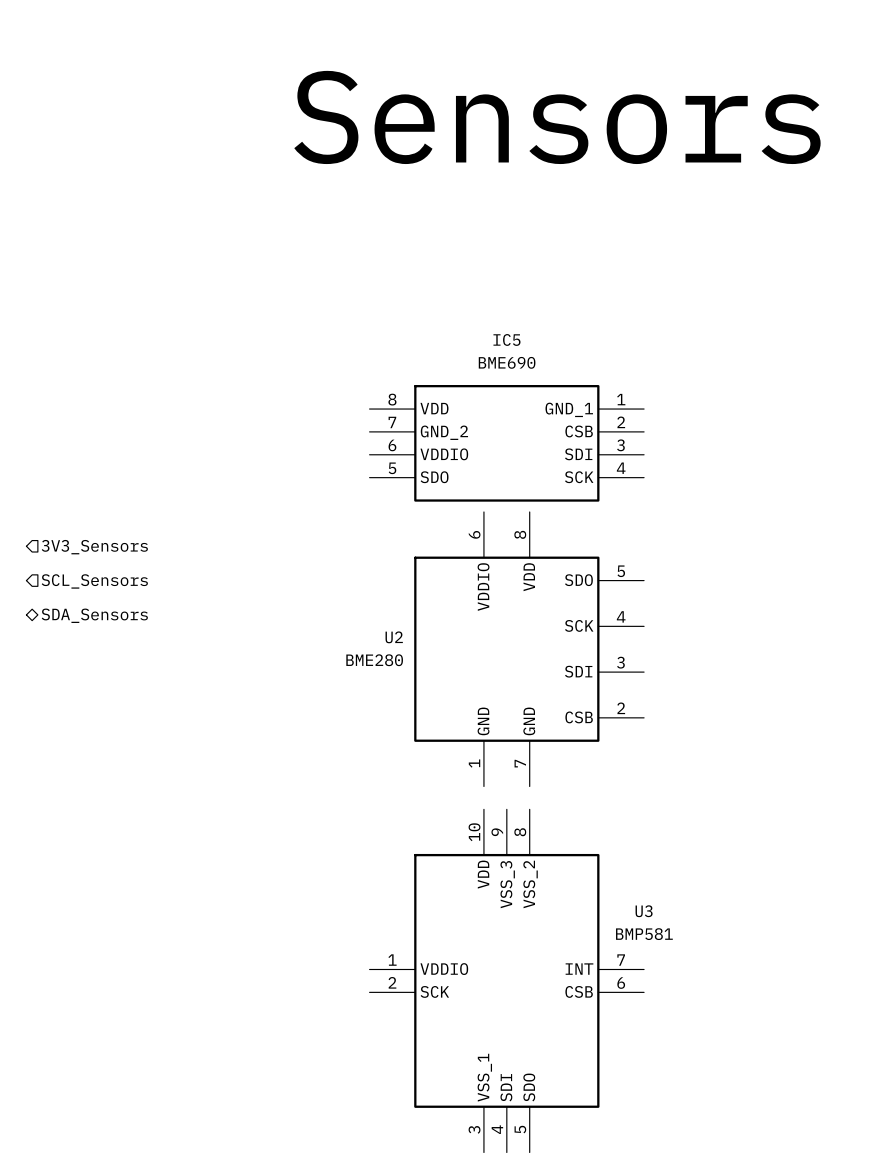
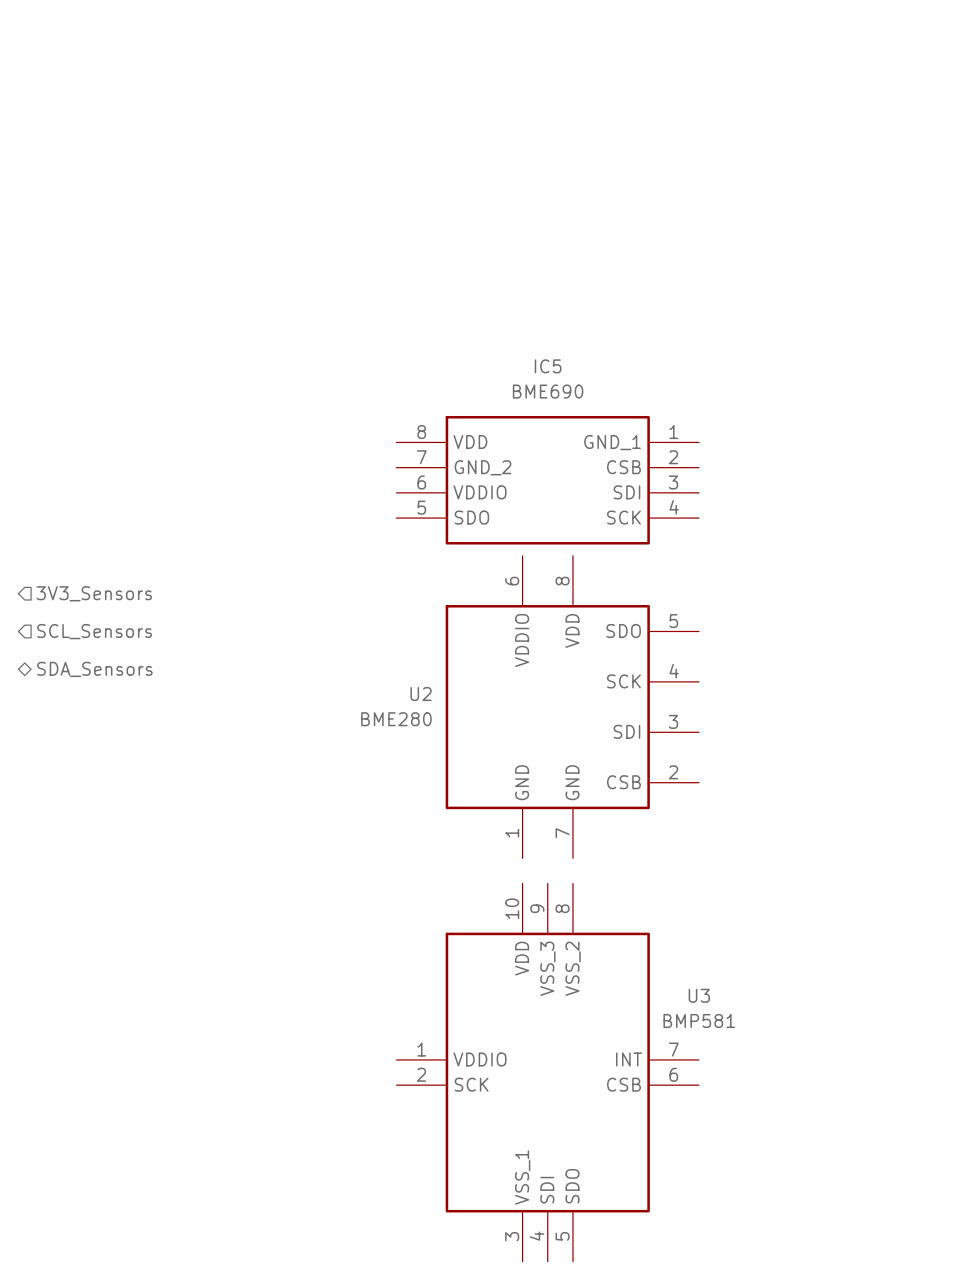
text: Sensors (557, 117) -> none

